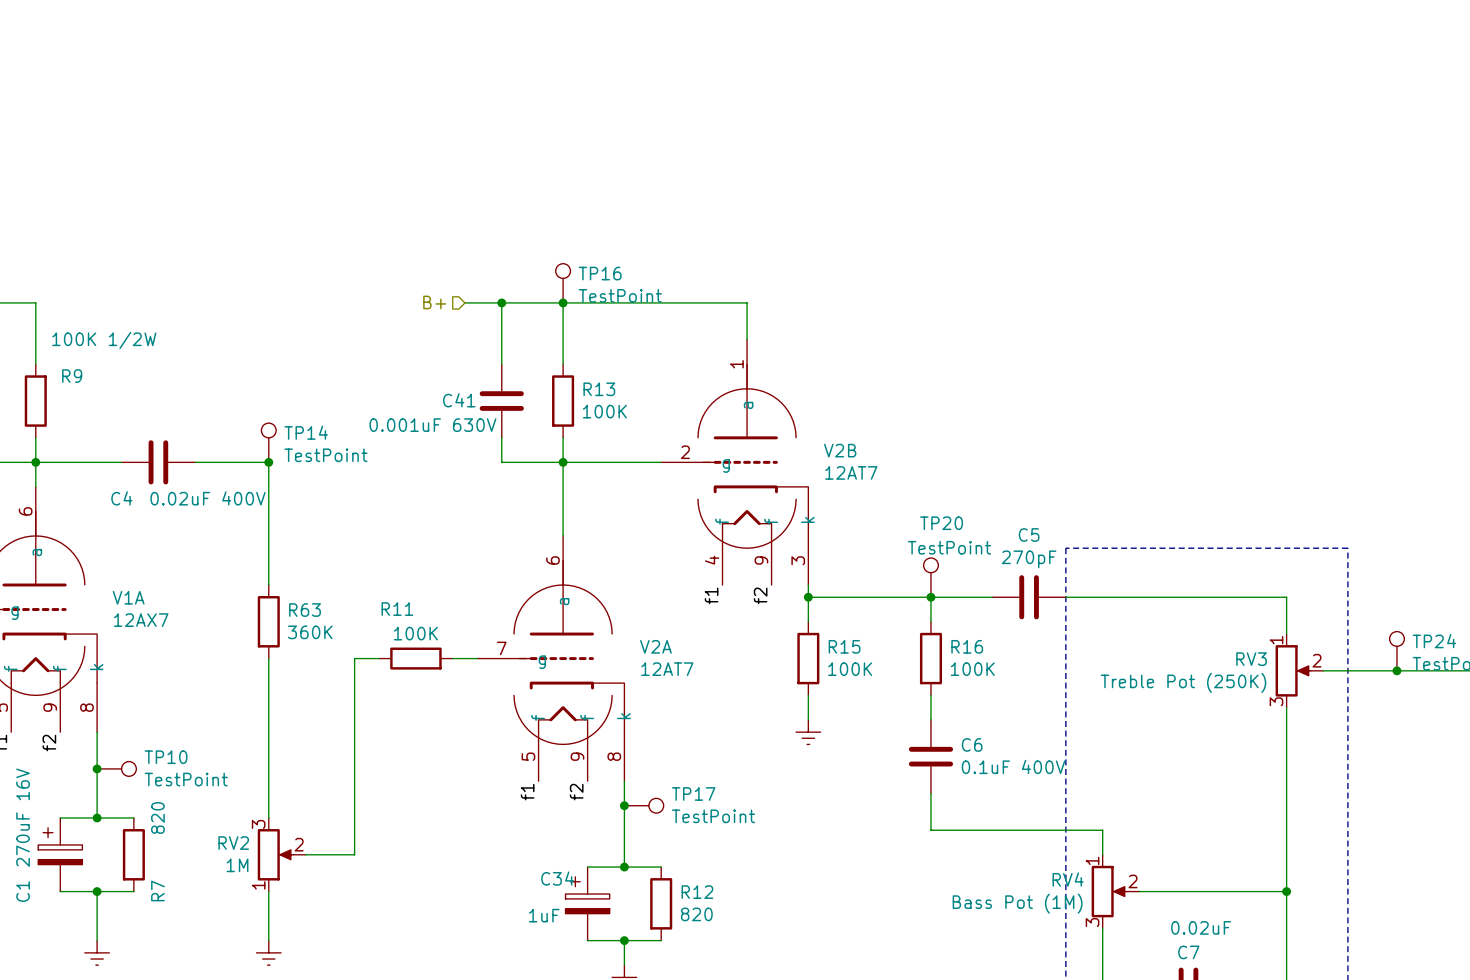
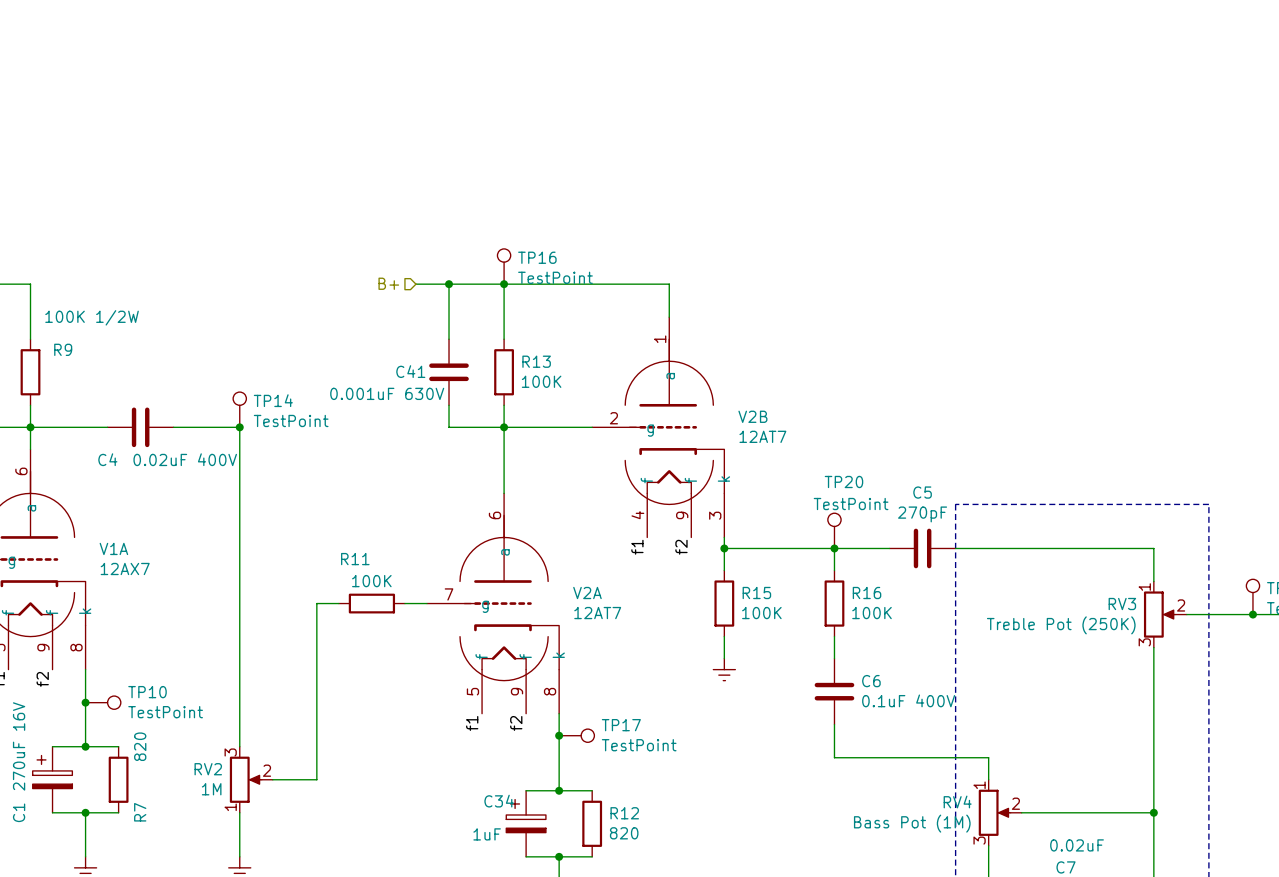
wire: none -> (239, 537) (239, 603)
R63: 360K (268, 621) -> none

